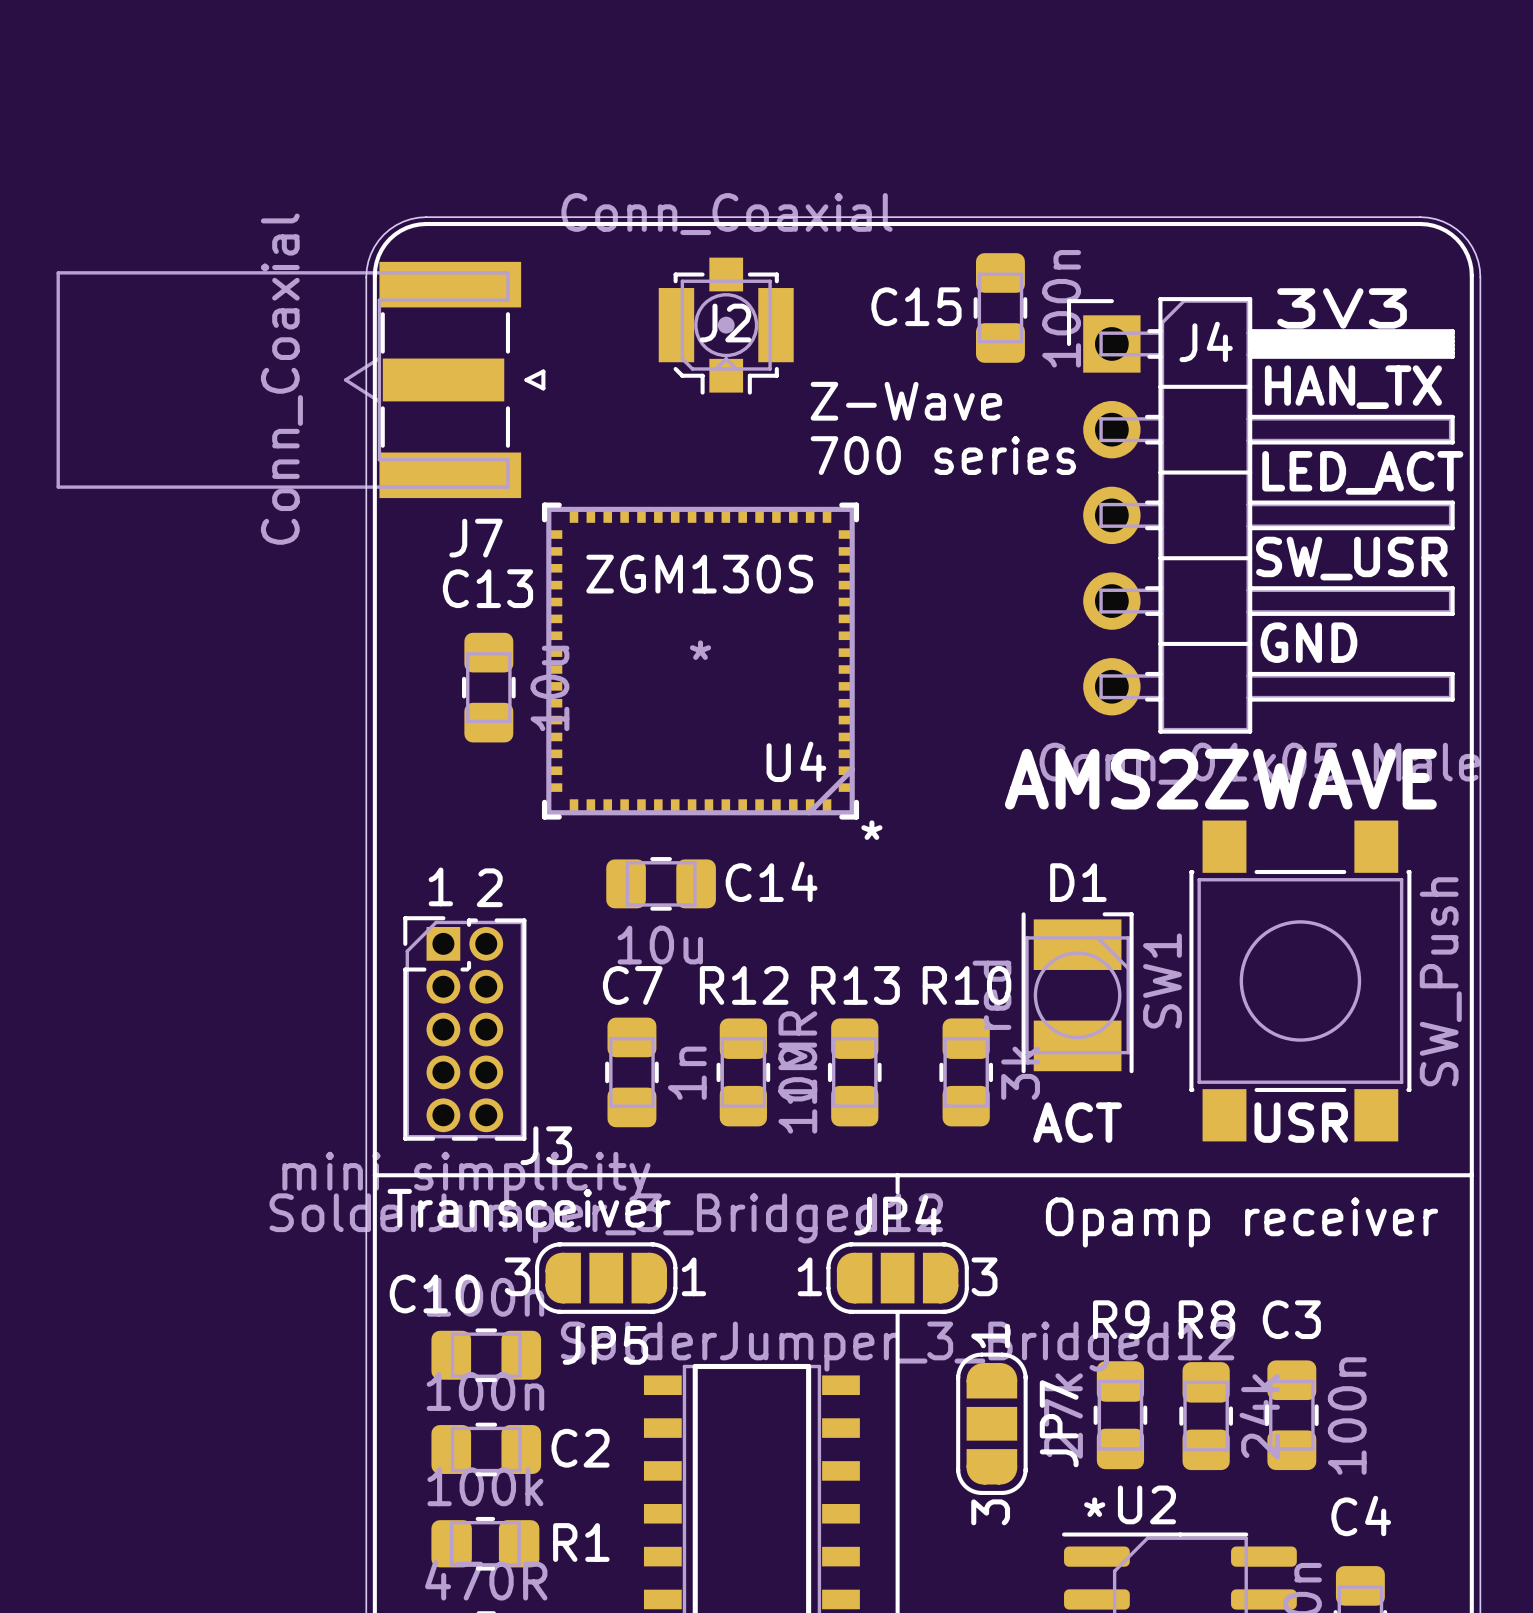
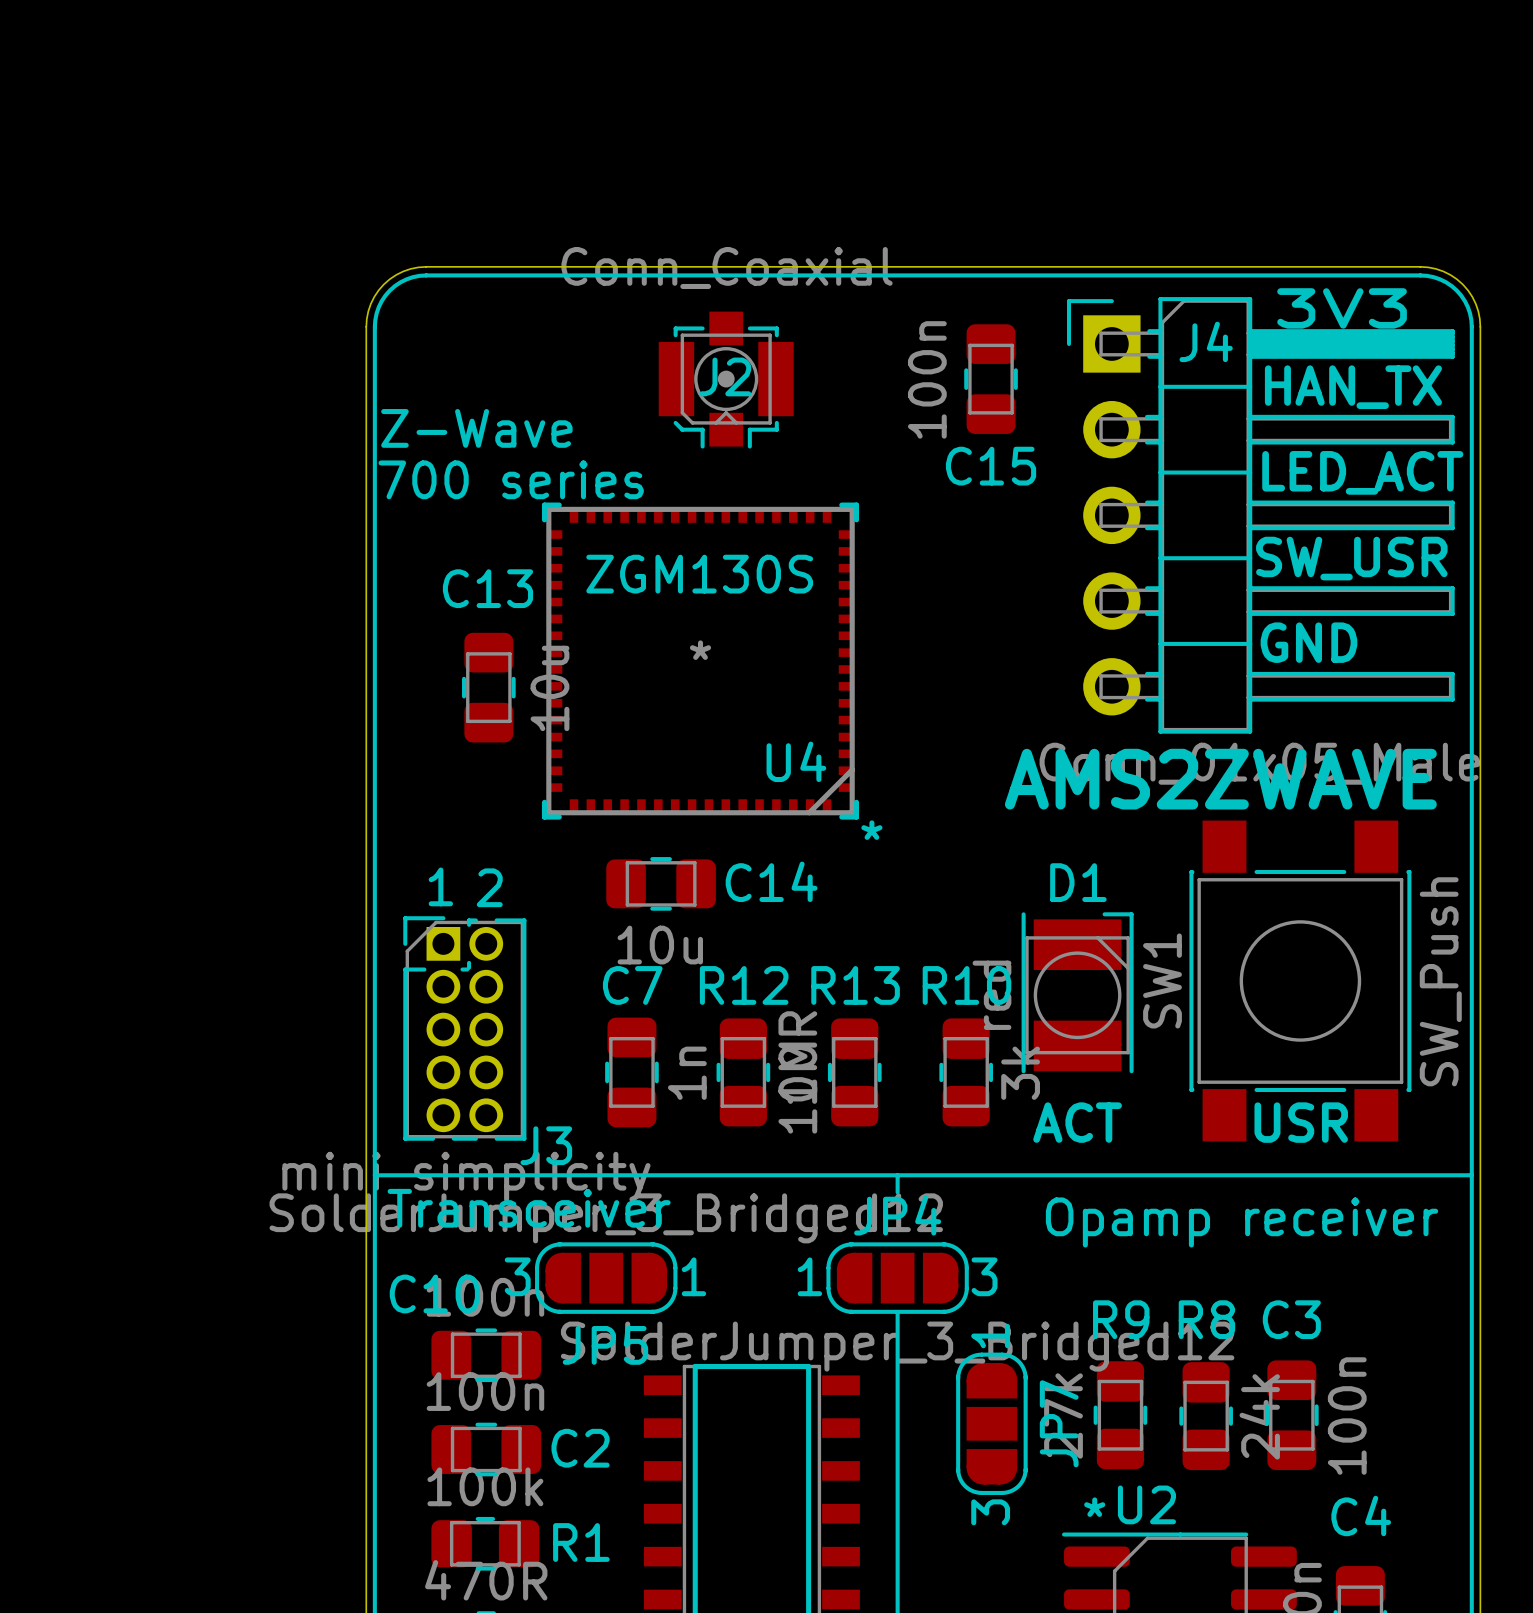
C15 name position: C15 (916, 306) -> C15 (991, 466)
C15 position: (1000, 307) -> (991, 379)
C15 value position: 100n (1061, 308) -> 100n (927, 379)
board edge: (366, 326) (366, 269) (374, 247) (383, 234) (396, 225) (410, 219) (426, 217) (1428, 217) (1443, 221) (1456, 229) (1467, 240) (1475, 254) (1480, 277) (1480, 326) -> (366, 326) (370, 303) (383, 284) (403, 271) (426, 266) (1420, 266) (1443, 271) (1462, 284) (1475, 303) (1480, 326)
line: (374, 326) (375, 268) (381, 249) (389, 239) (400, 230) (412, 225) (426, 224) (1427, 224) (1440, 227) (1451, 234) (1461, 244) (1467, 255) (1471, 275) (1471, 326) -> (374, 326) (378, 307) (389, 290) (406, 279) (426, 275) (1420, 275) (1440, 279) (1456, 290) (1467, 307) (1471, 326)
J2 position: (726, 326) -> (726, 380)
J7: Conn_Coaxial (300, 379) -> none
text position: Z-Wave (906, 401) -> Z-Wave (476, 428)
text position: 700 series (943, 455) -> 700 series (511, 479)

